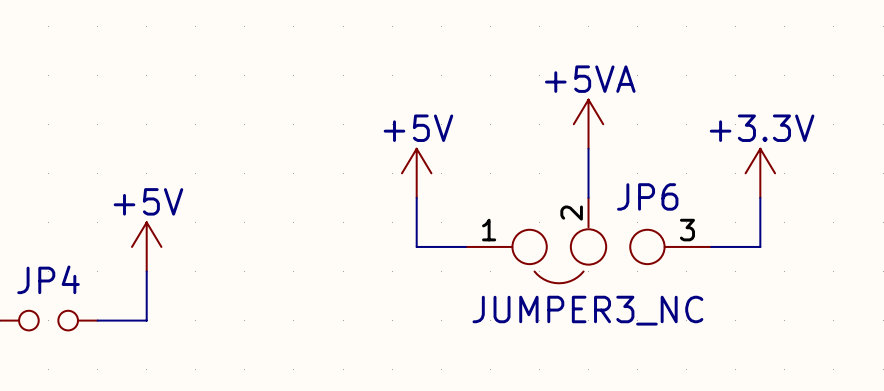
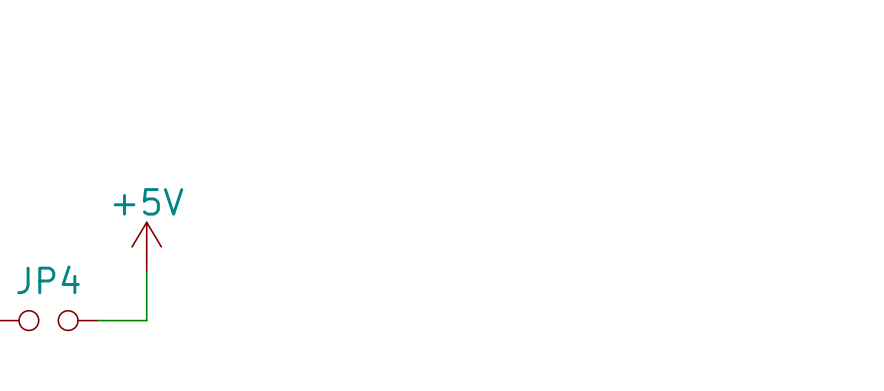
power symbol: +5VA (588, 124) -> none
wire: (588, 148) (588, 197) -> none
power symbol: +5V (416, 173) -> none
power symbol: +3.3V (760, 173) -> none
wire: (416, 197) (416, 246) (465, 246) -> none
wire: (760, 197) (760, 246) (711, 246) -> none
JP6: JUMPER3_NC (588, 240) -> none

